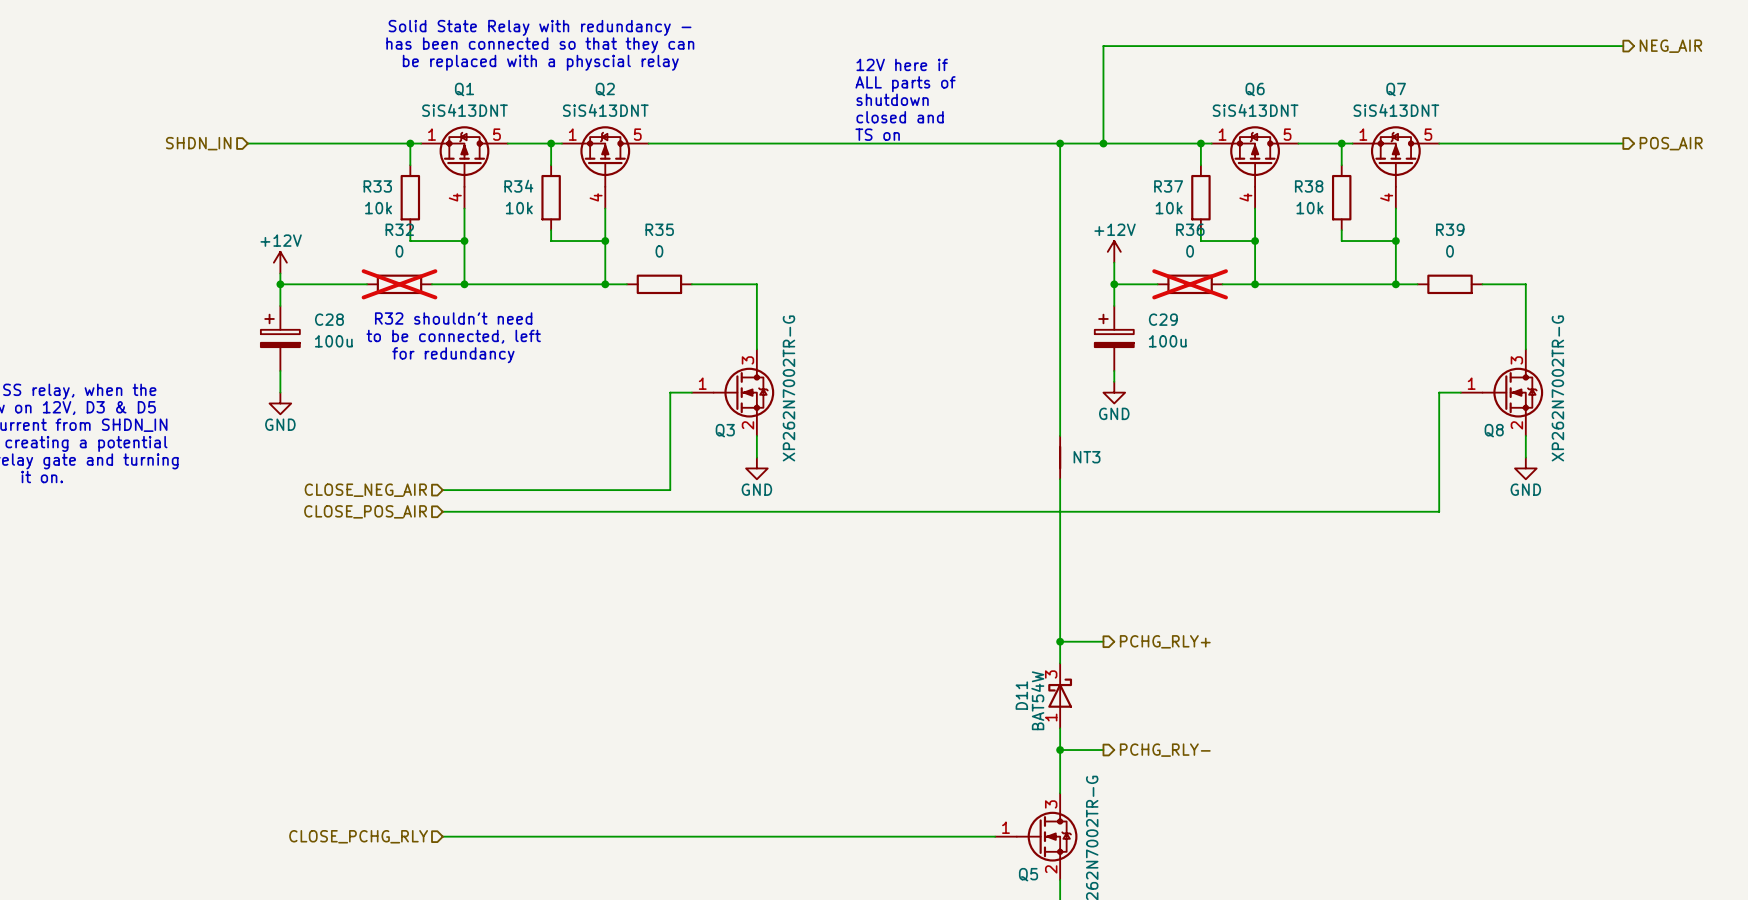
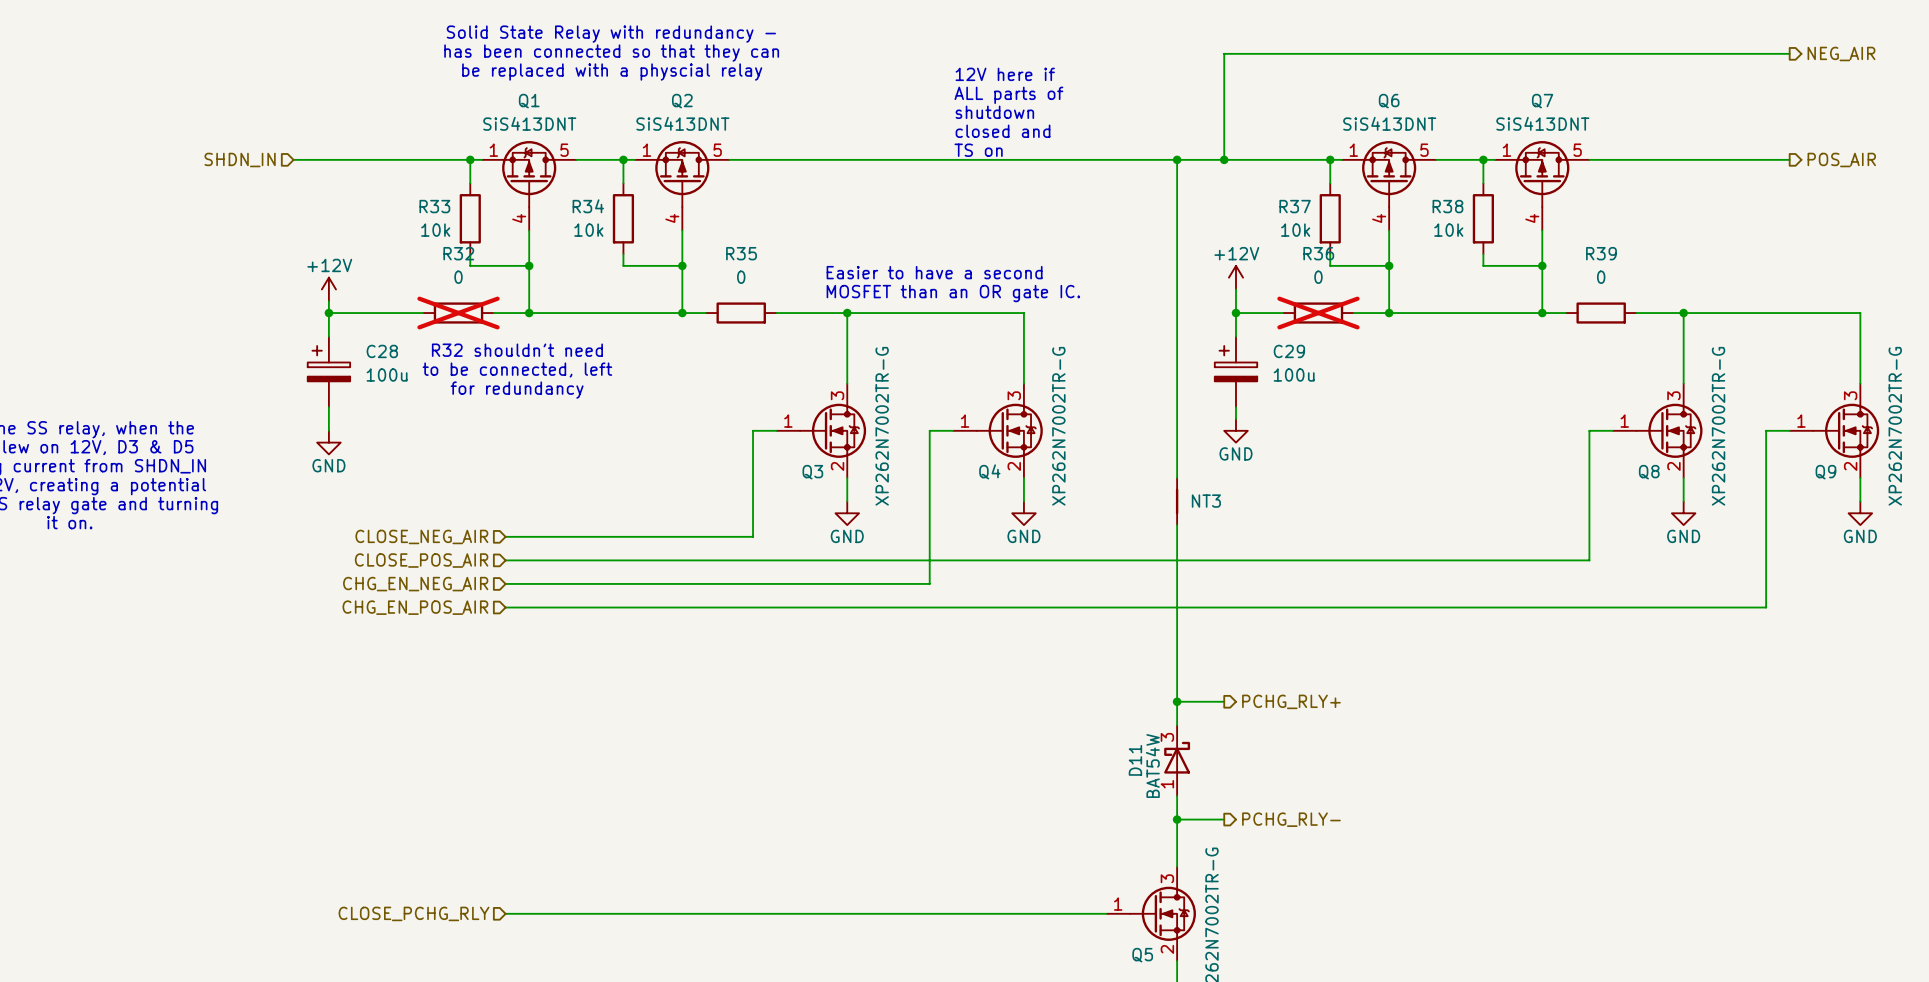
text: none -> Easier to have a second (934, 272)
text: none -> MOSFET than an OR gate IC. (953, 293)
wire: none -> (847, 313) (1023, 313) (1023, 383)
junction: none -> (847, 313)
wire: none -> (1683, 313) (1860, 313) (1860, 383)
junction: none -> (1683, 313)
wire: none -> (953, 430) (929, 430) (929, 583) (505, 583)
Q4: none -> XP262N7002TR-G (998, 430)
wire: none -> (1789, 430) (1766, 430) (1766, 607) (505, 607)
Q9: none -> XP262N7002TR-G (1834, 430)
wire: none -> (1023, 477) (1023, 501)
wire: none -> (1860, 477) (1860, 501)
power symbol: none -> GND (1023, 513)
power symbol: none -> GND (1860, 513)
hierarchical label: none -> CHG_EN_NEG_AIR (415, 584)
hierarchical label: none -> CHG_EN_POS_AIR (415, 607)

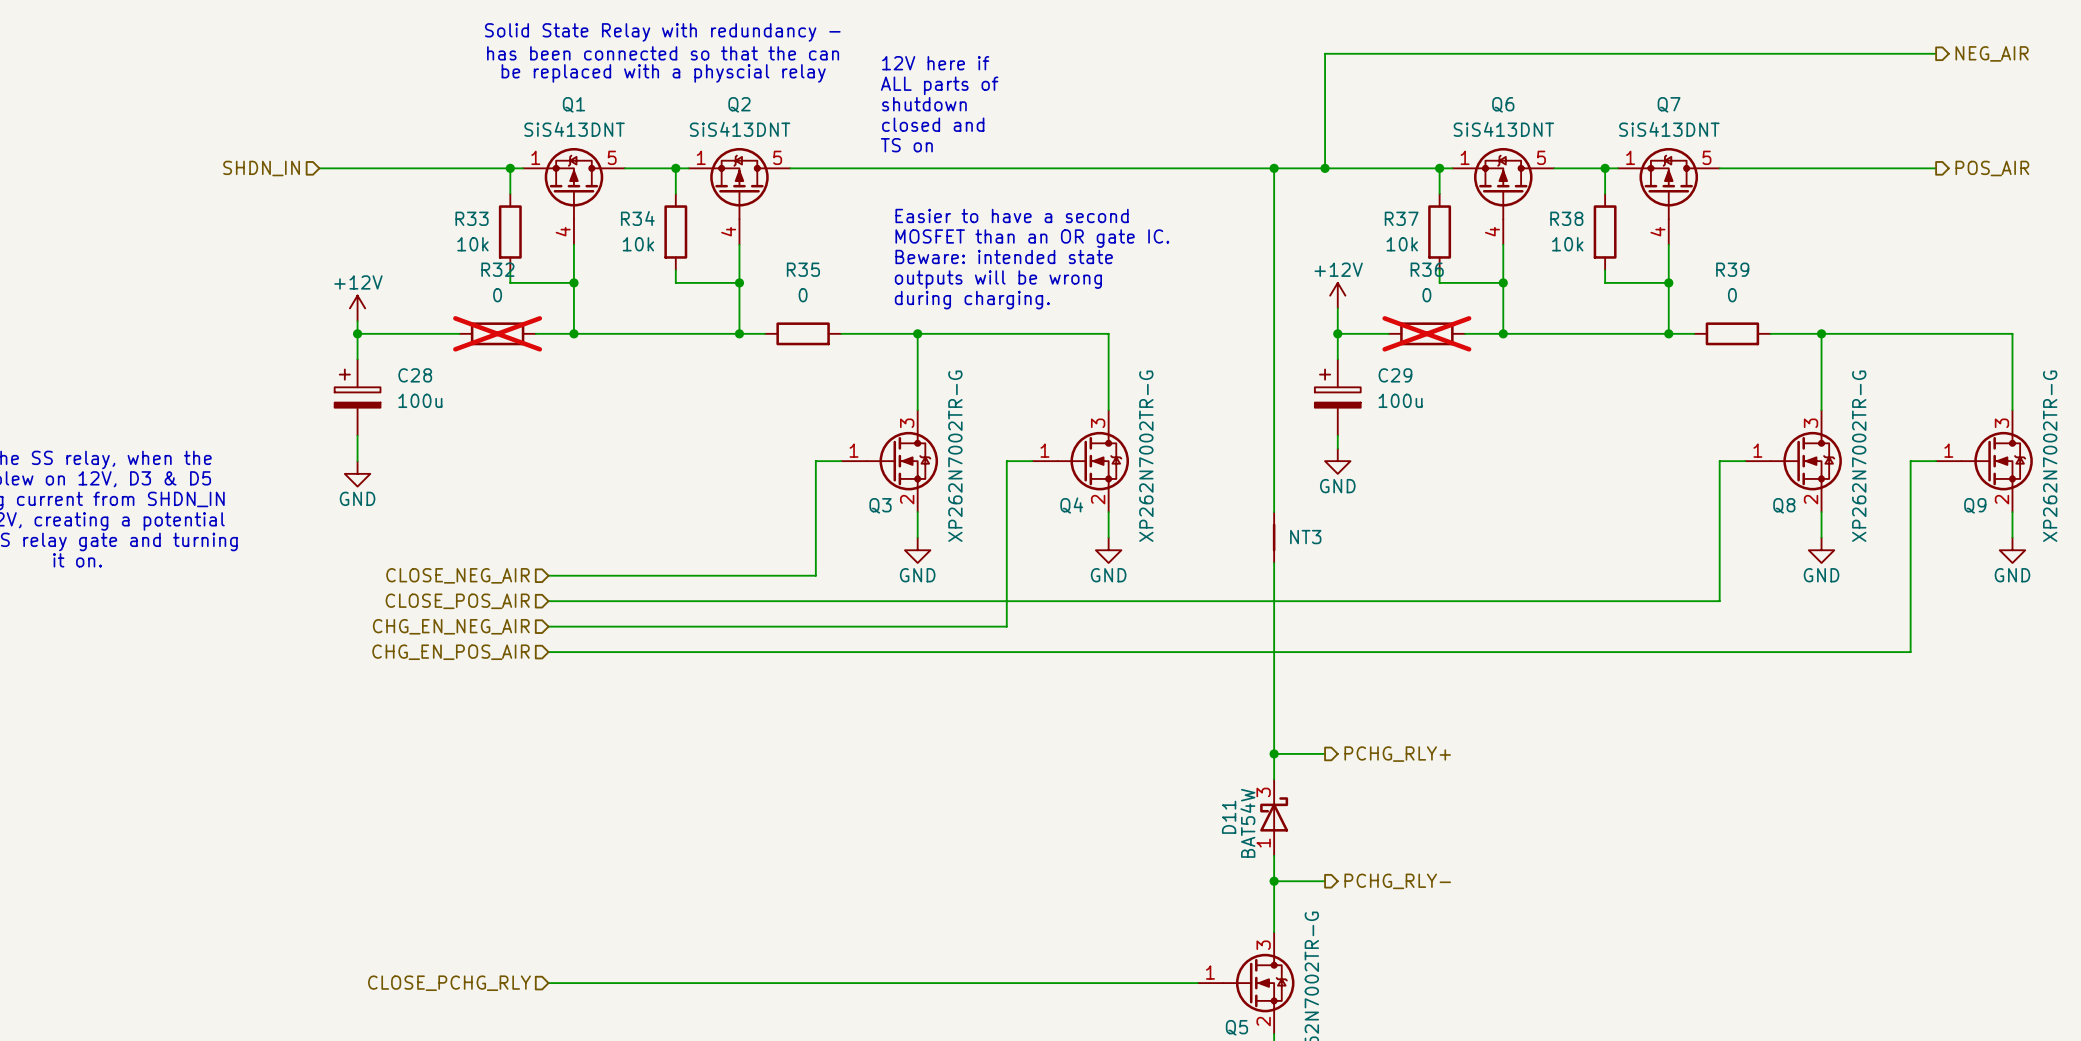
text: has been connected so that they can (611, 53) -> has been connected so that the can (663, 53)
text position: 12V here if (1005, 74) -> 12V here if (935, 63)
text position: ALL parts of (1008, 95) -> ALL parts of (939, 85)
text position: shutdown (994, 112) -> shutdown (924, 104)
text position: closed and (1003, 131) -> closed and (933, 124)
text position: TS on (978, 150) -> TS on (906, 145)
text: none -> Beware: intended state (1004, 256)
text: none -> outputs will be wrong (998, 279)
text position: Easier to have a second (934, 272) -> Easier to have a second (1012, 215)
text: none -> during charging. (972, 300)
text position: MOSFET than an OR gate IC. (953, 293) -> MOSFET than an OR gate IC. (1032, 238)
text: R32 shouldn't need (517, 350) -> none
text: to be connected, left (517, 370) -> none
text: for redundancy (517, 390) -> none

